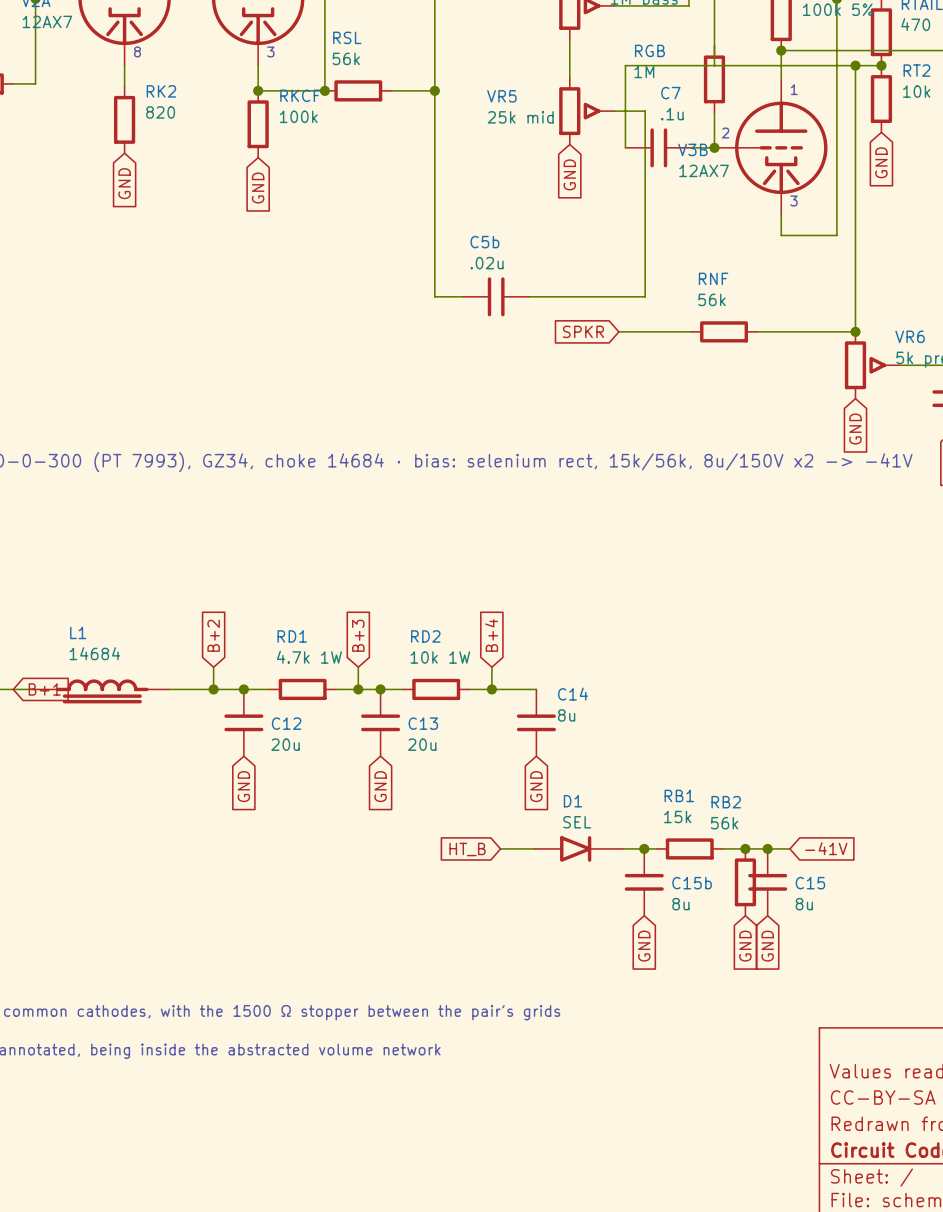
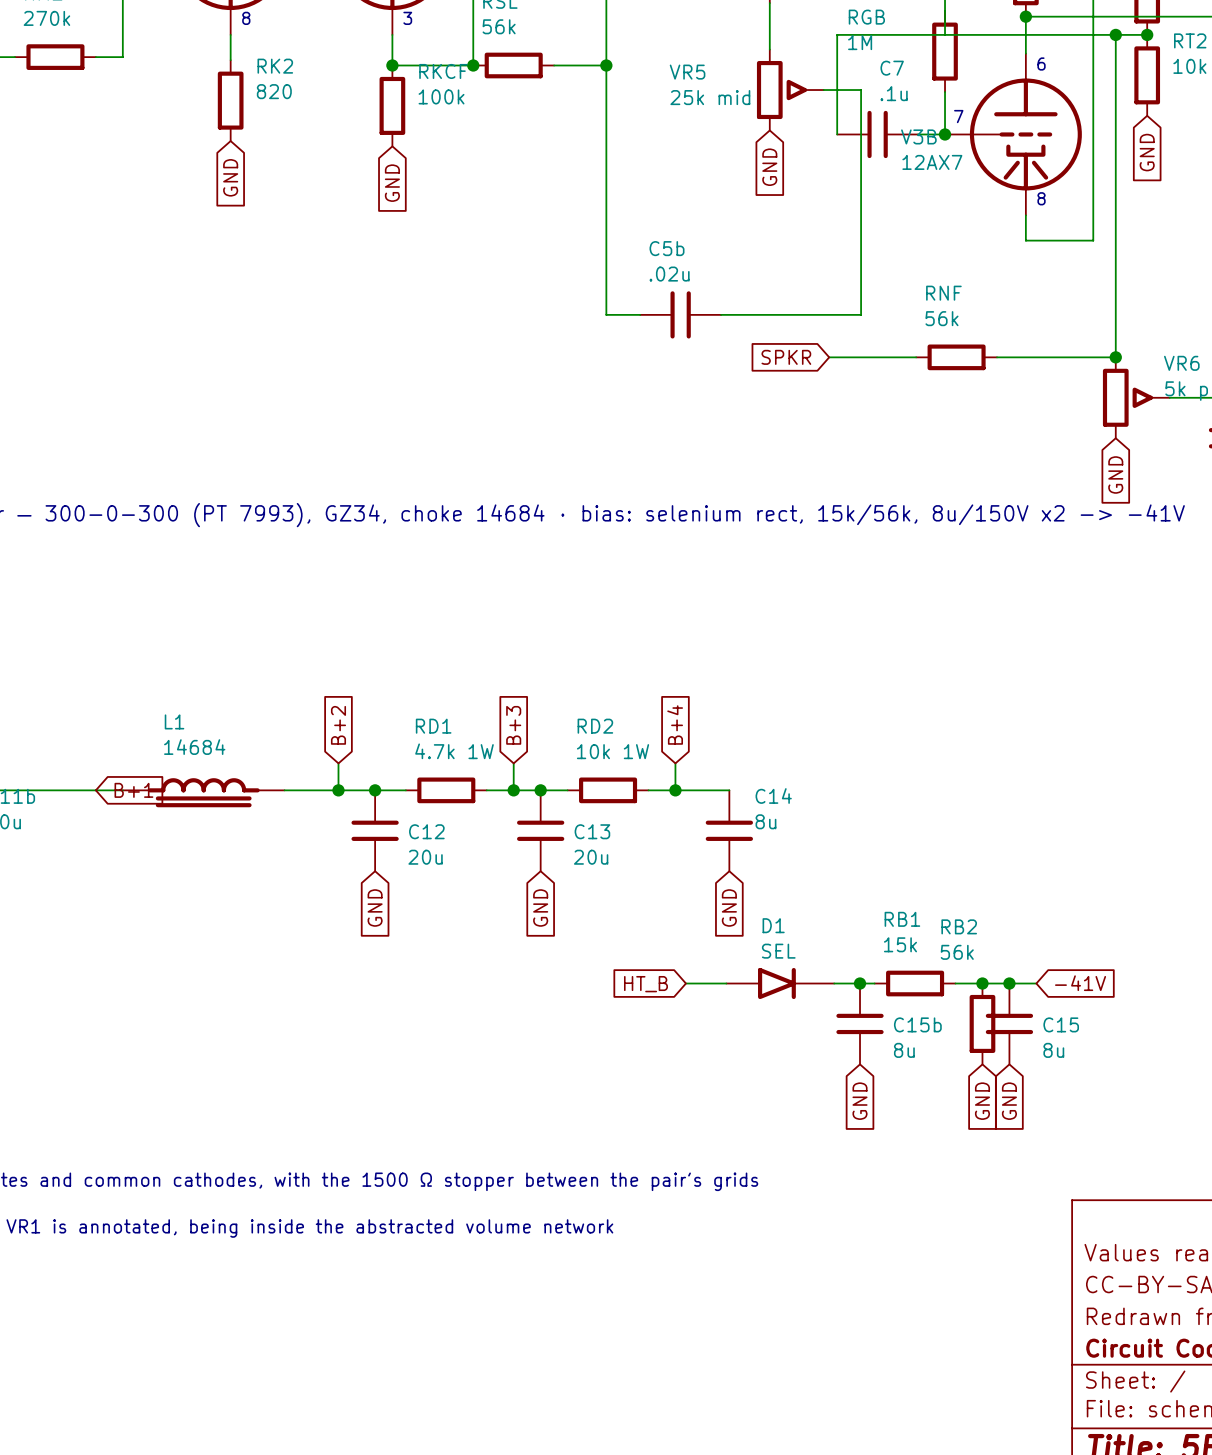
text: 1 (794, 89) -> 6 (1041, 64)
text: 2 (725, 133) -> 7 (958, 116)
text: 3 (793, 200) -> 8 (1041, 198)

